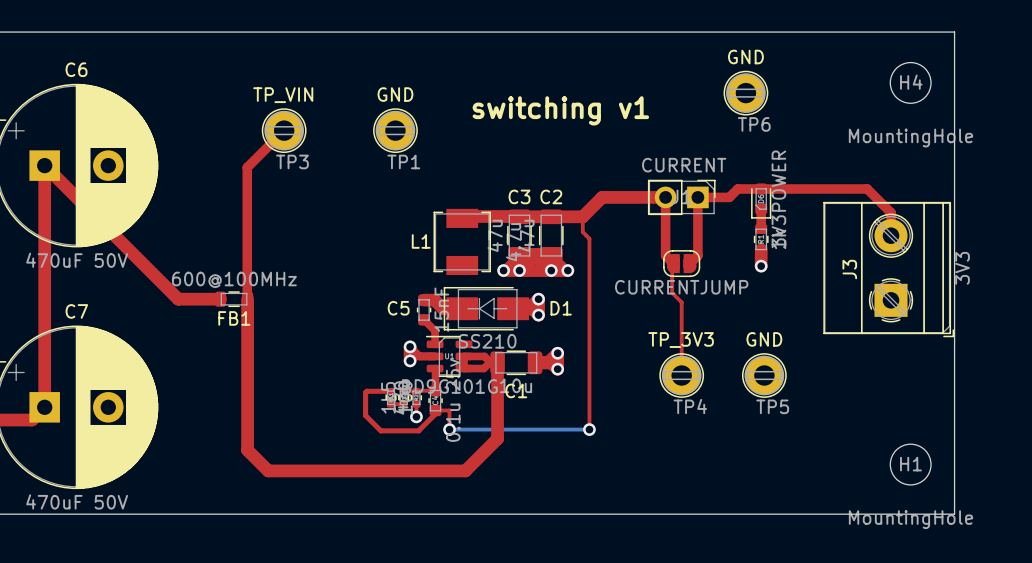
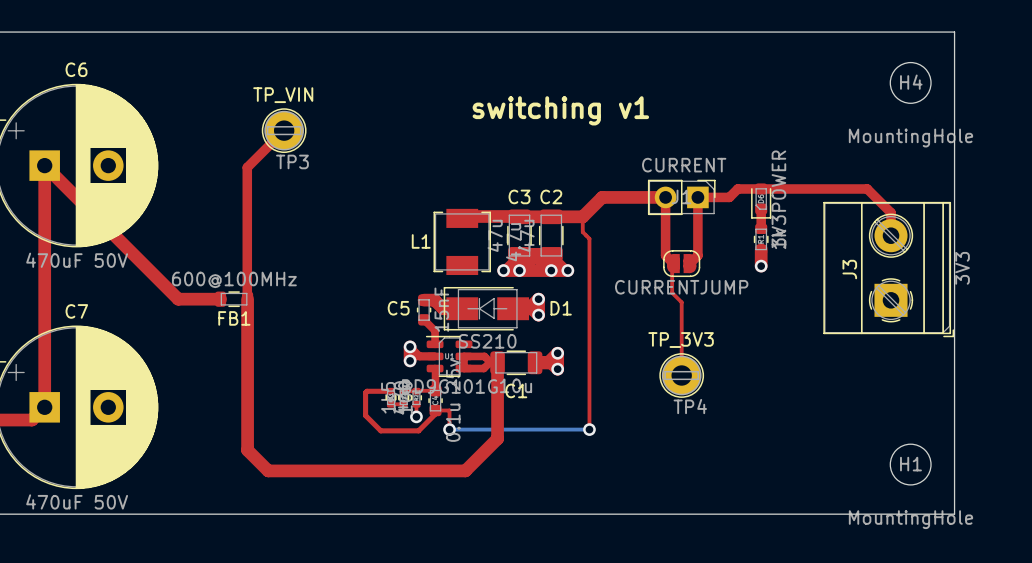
TP6: GND (745, 93) -> none
TP1: GND (395, 130) -> none
TP5: GND (764, 375) -> none

